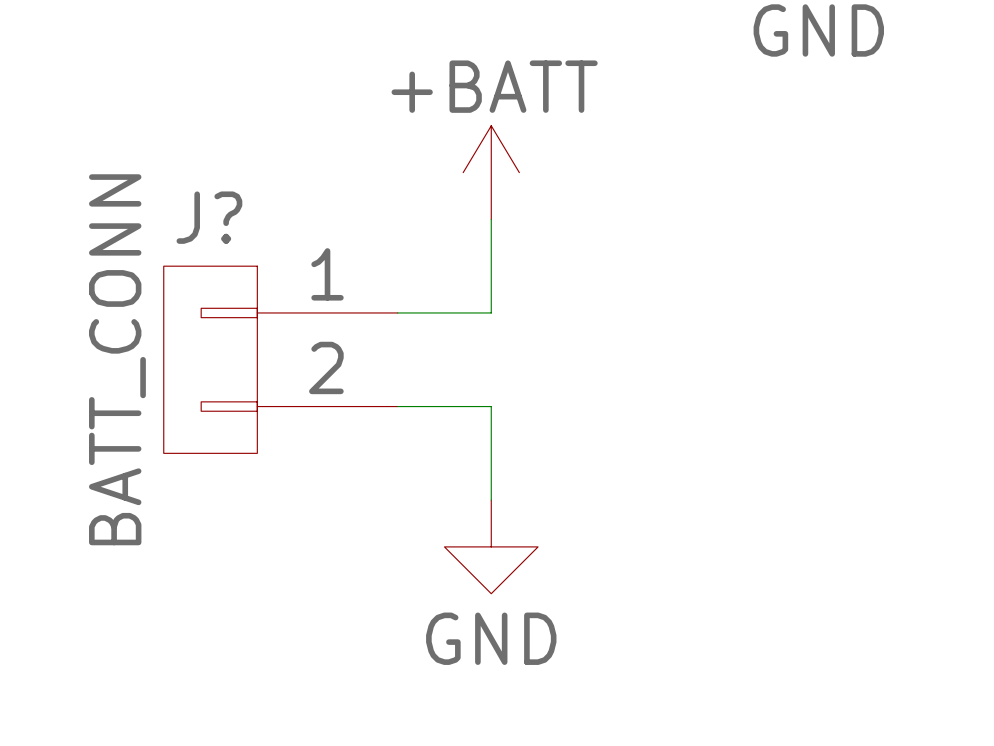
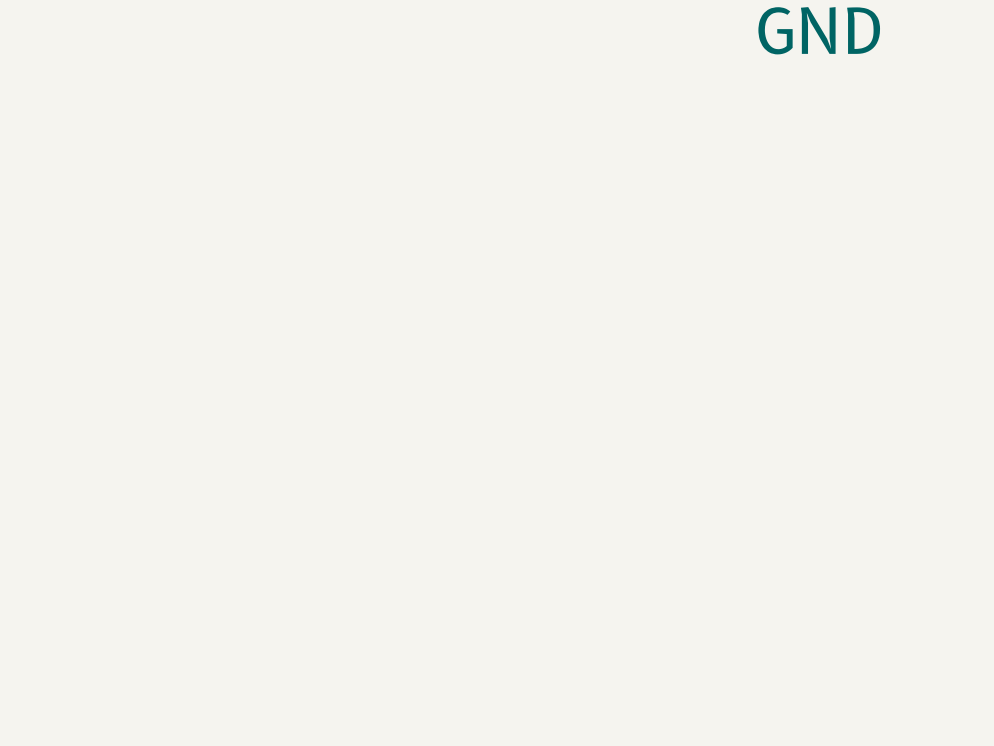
power symbol: +BATT (491, 172) -> none
wire: (491, 219) (491, 312) (397, 312) -> none
J?: BATT_CONN (280, 359) -> none
wire: (397, 406) (491, 406) (491, 500) -> none
power symbol: GND (491, 546) -> none

